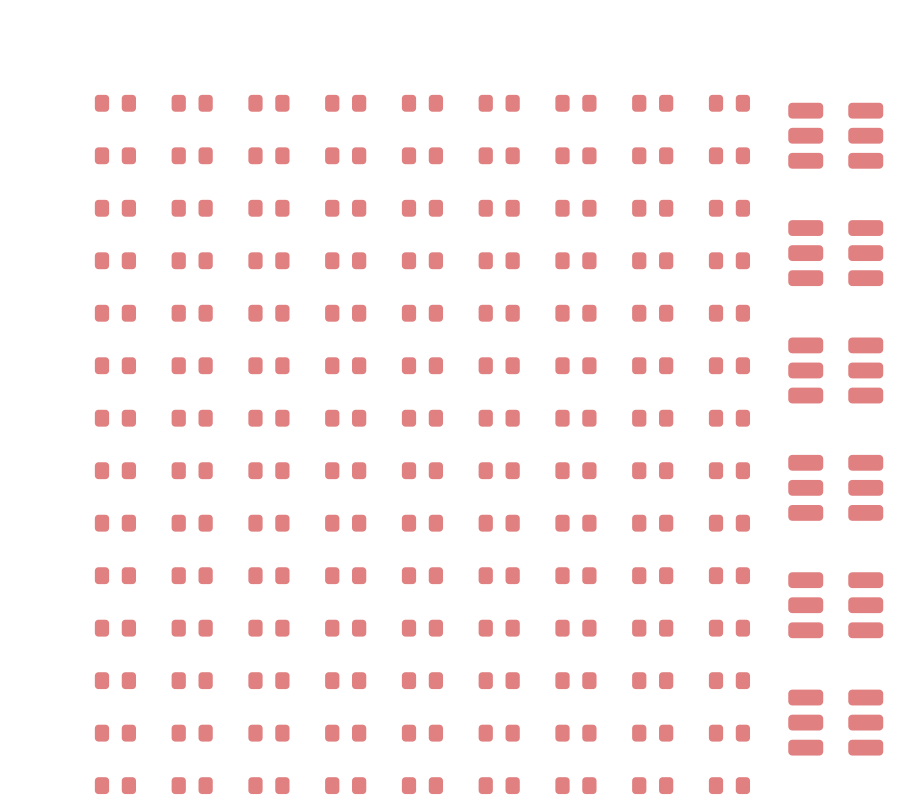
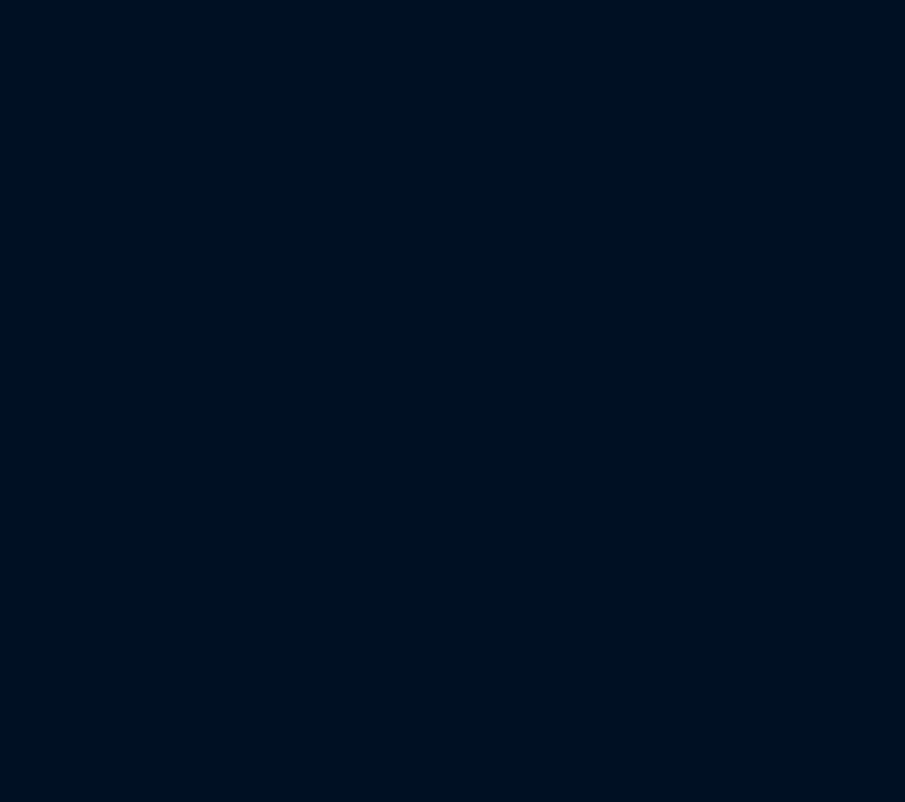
part: (115, 103) -> none
part: (192, 103) -> none
part: (268, 103) -> none
part: (345, 103) -> none
part: (422, 103) -> none
part: (499, 103) -> none
part: (575, 103) -> none
part: (652, 103) -> none
part: (729, 103) -> none
part: (835, 135) -> none
part: (115, 155) -> none
part: (192, 155) -> none
part: (268, 155) -> none
part: (345, 155) -> none
part: (422, 155) -> none
part: (499, 155) -> none
part: (575, 155) -> none
part: (652, 155) -> none
part: (729, 155) -> none
part: (115, 208) -> none
part: (192, 208) -> none
part: (268, 208) -> none
part: (345, 208) -> none
part: (422, 208) -> none
part: (499, 208) -> none
part: (575, 208) -> none
part: (652, 208) -> none
part: (729, 208) -> none
part: (835, 253) -> none
part: (115, 260) -> none
part: (192, 260) -> none
part: (268, 260) -> none
part: (345, 260) -> none
part: (422, 260) -> none
part: (499, 260) -> none
part: (575, 260) -> none
part: (652, 260) -> none
part: (729, 260) -> none
part: (115, 313) -> none
part: (192, 313) -> none
part: (268, 313) -> none
part: (345, 313) -> none
part: (422, 313) -> none
part: (499, 313) -> none
part: (575, 313) -> none
part: (652, 313) -> none
part: (729, 313) -> none
part: (115, 365) -> none
part: (192, 365) -> none
part: (268, 365) -> none
part: (345, 365) -> none
part: (422, 365) -> none
part: (499, 365) -> none
part: (575, 365) -> none
part: (652, 365) -> none
part: (729, 365) -> none
part: (835, 370) -> none
part: (115, 418) -> none
part: (192, 418) -> none
part: (268, 418) -> none
part: (345, 418) -> none
part: (422, 418) -> none
part: (499, 418) -> none
part: (575, 418) -> none
part: (652, 418) -> none
part: (729, 418) -> none
part: (115, 470) -> none
part: (192, 470) -> none
part: (268, 470) -> none
part: (345, 470) -> none
part: (422, 470) -> none
part: (499, 470) -> none
part: (575, 470) -> none
part: (652, 470) -> none
part: (729, 470) -> none
part: (835, 487) -> none
part: (115, 523) -> none
part: (192, 523) -> none
part: (268, 523) -> none
part: (345, 523) -> none
part: (422, 523) -> none
part: (499, 523) -> none
part: (575, 523) -> none
part: (652, 523) -> none
part: (729, 523) -> none
part: (115, 575) -> none
part: (192, 575) -> none
part: (268, 575) -> none
part: (345, 575) -> none
part: (422, 575) -> none
part: (499, 575) -> none
part: (575, 575) -> none
part: (652, 575) -> none
part: (729, 575) -> none
part: (835, 605) -> none
part: (115, 628) -> none
part: (192, 628) -> none
part: (268, 628) -> none
part: (345, 628) -> none
part: (422, 628) -> none
part: (499, 628) -> none
part: (575, 628) -> none
part: (652, 628) -> none
part: (729, 628) -> none
part: (115, 680) -> none
part: (192, 680) -> none
part: (268, 680) -> none
part: (345, 680) -> none
part: (422, 680) -> none
part: (499, 680) -> none
part: (575, 680) -> none
part: (652, 680) -> none
part: (729, 680) -> none
part: (835, 722) -> none
part: (115, 733) -> none
part: (192, 733) -> none
part: (268, 733) -> none
part: (345, 733) -> none
part: (422, 733) -> none
part: (499, 733) -> none
part: (575, 733) -> none
part: (652, 733) -> none
part: (729, 733) -> none
part: (115, 785) -> none
part: (192, 785) -> none
part: (268, 785) -> none
part: (345, 785) -> none
part: (422, 785) -> none
part: (499, 785) -> none
part: (575, 785) -> none
part: (652, 785) -> none
part: (729, 785) -> none

